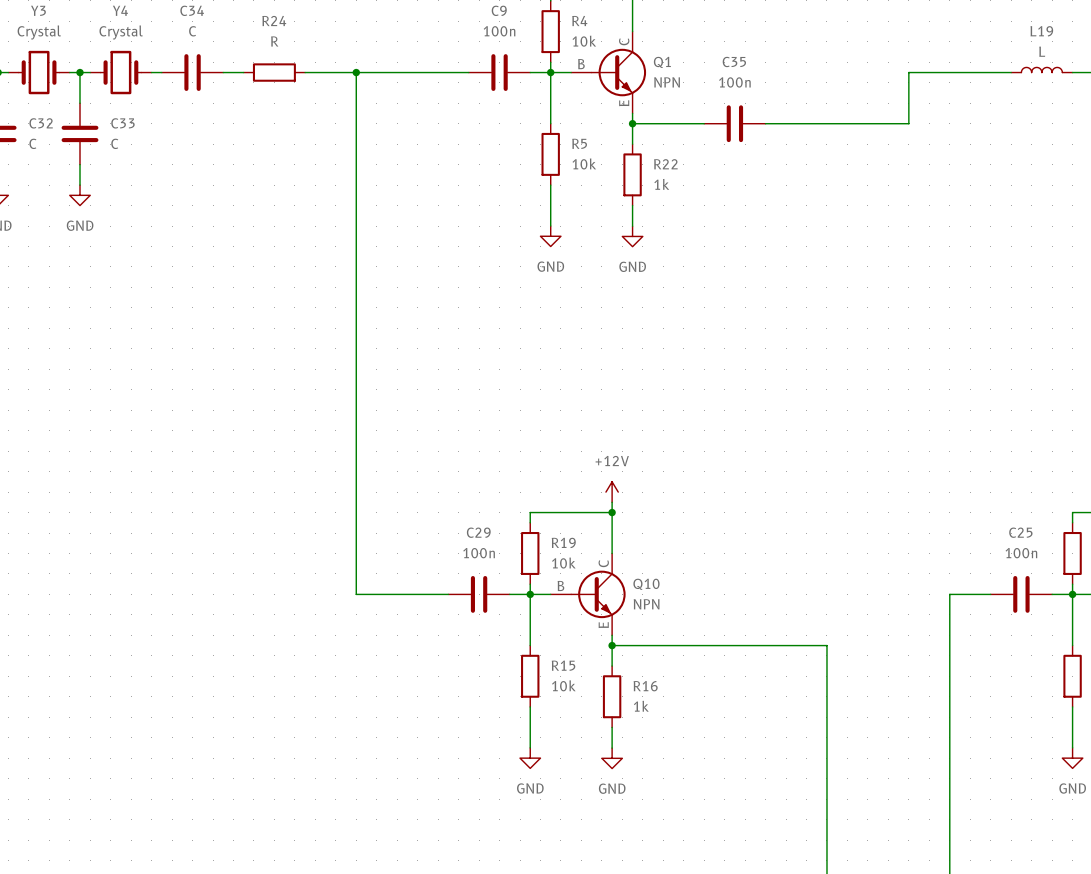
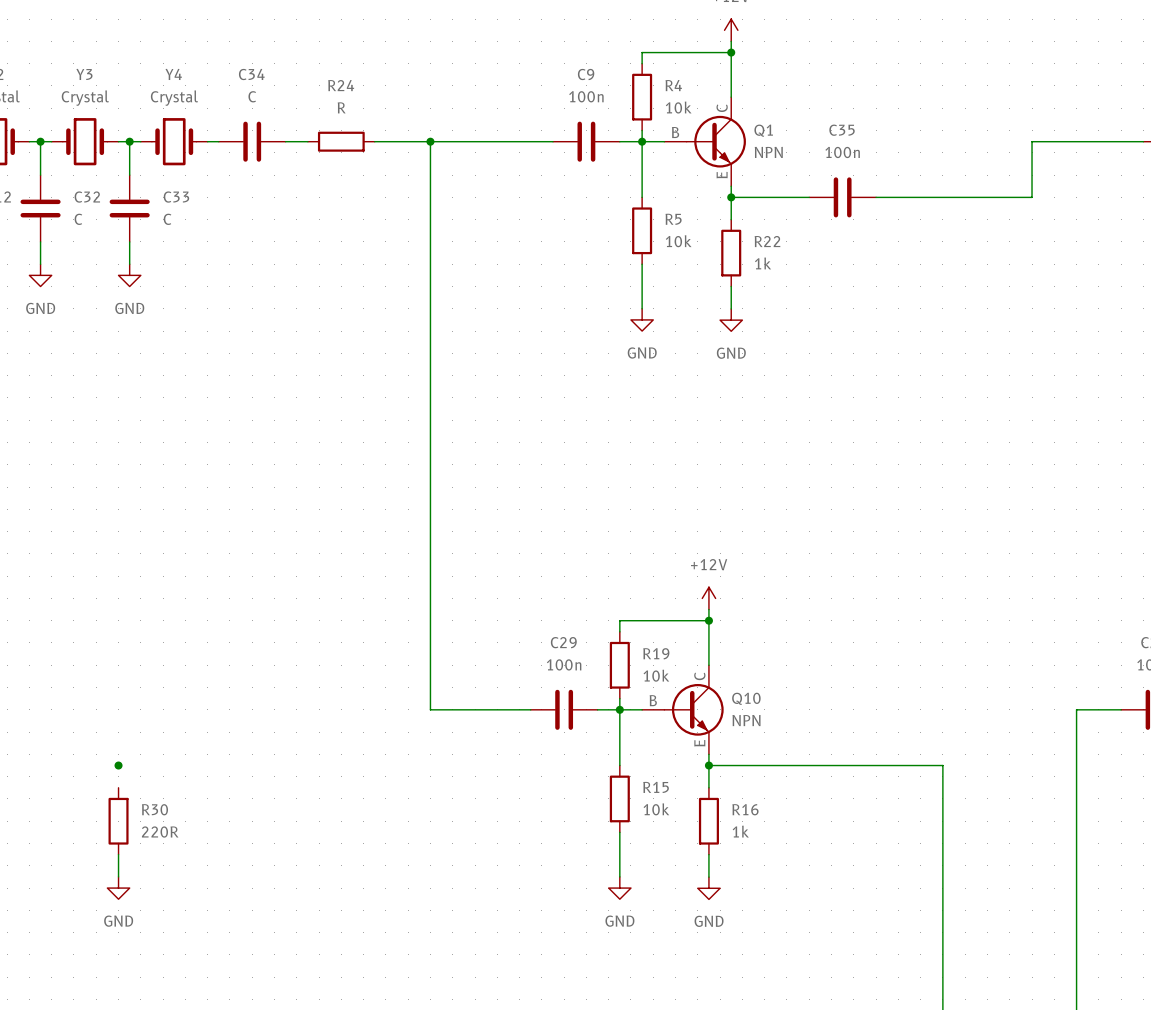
junction: none -> (118, 765)
R30: none -> 220R (118, 821)
wire: none -> (118, 854) (118, 876)
power symbol: none -> GND (118, 888)

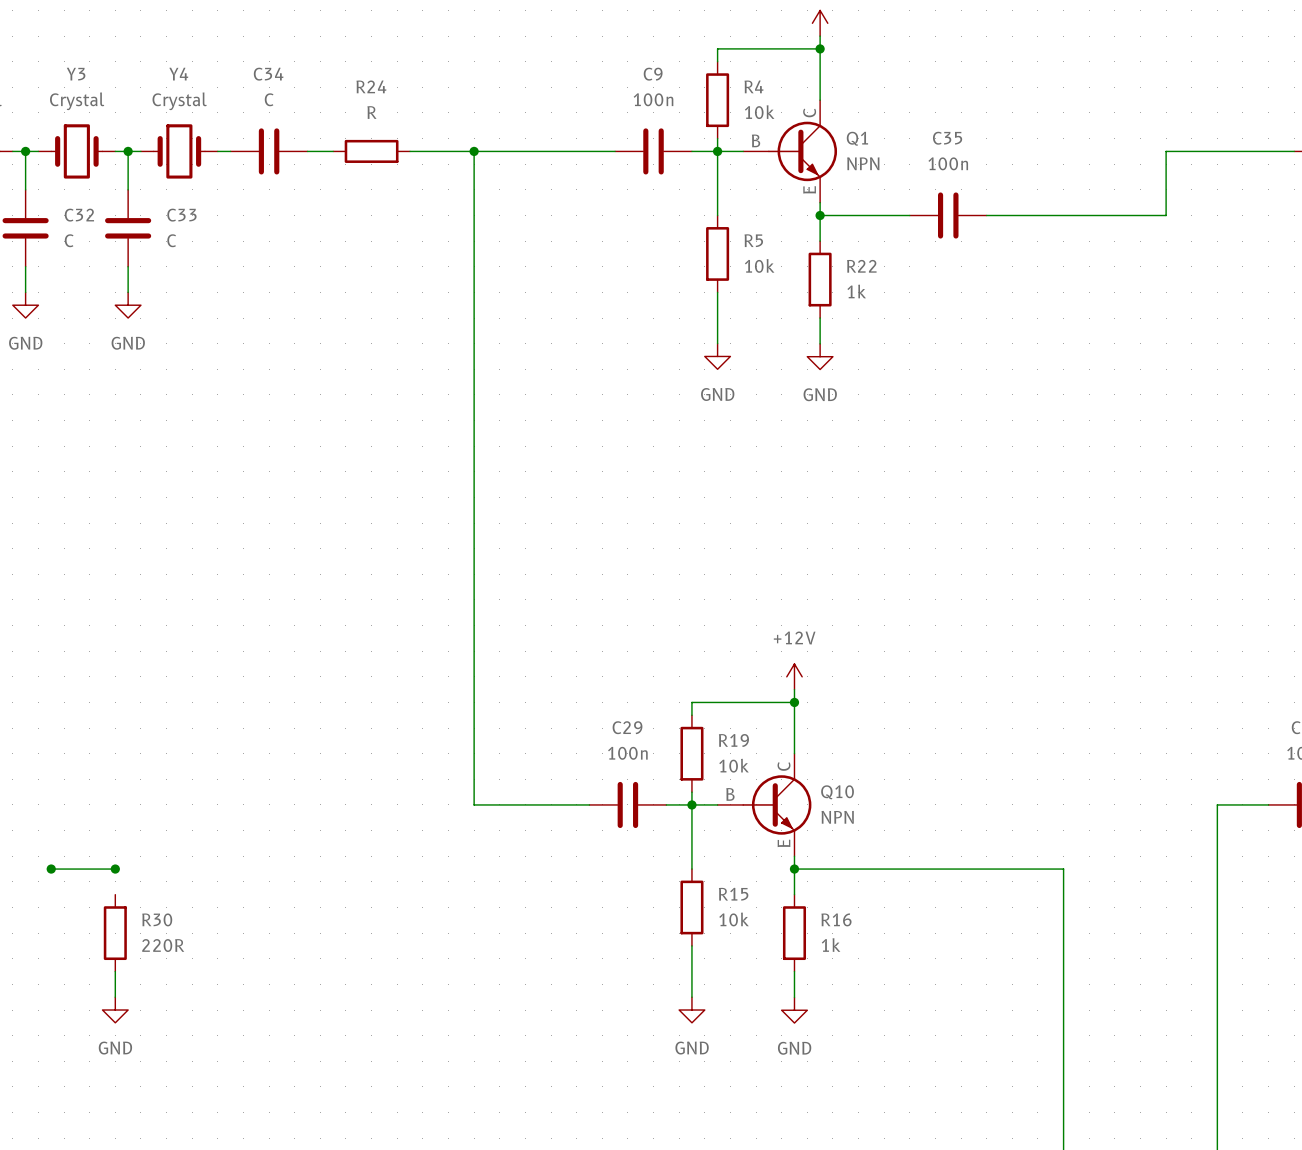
wire: none -> (51, 869) (115, 869)
junction: none -> (51, 869)

